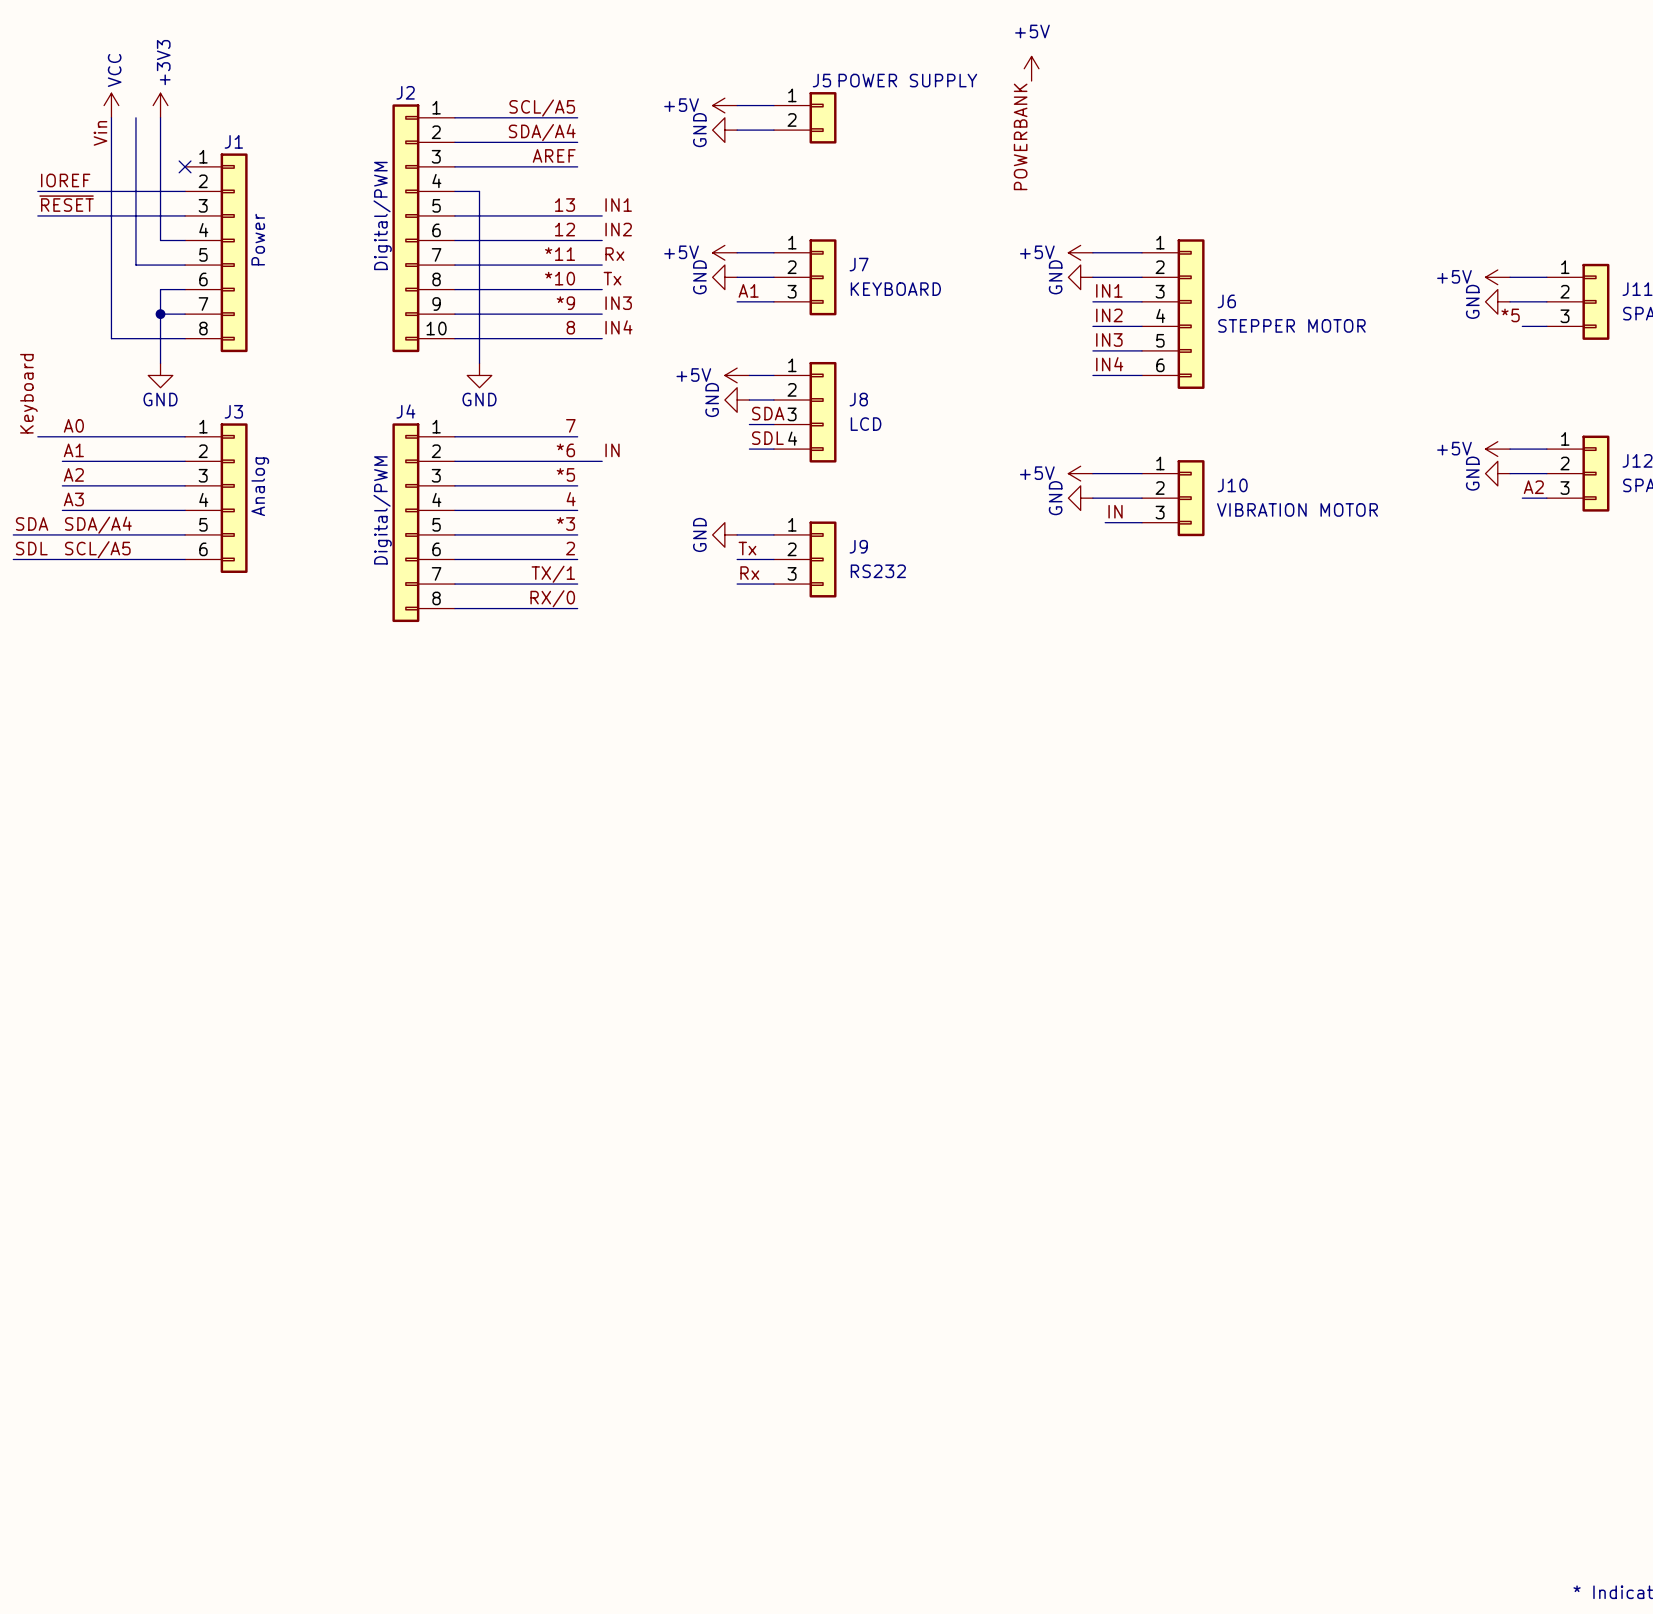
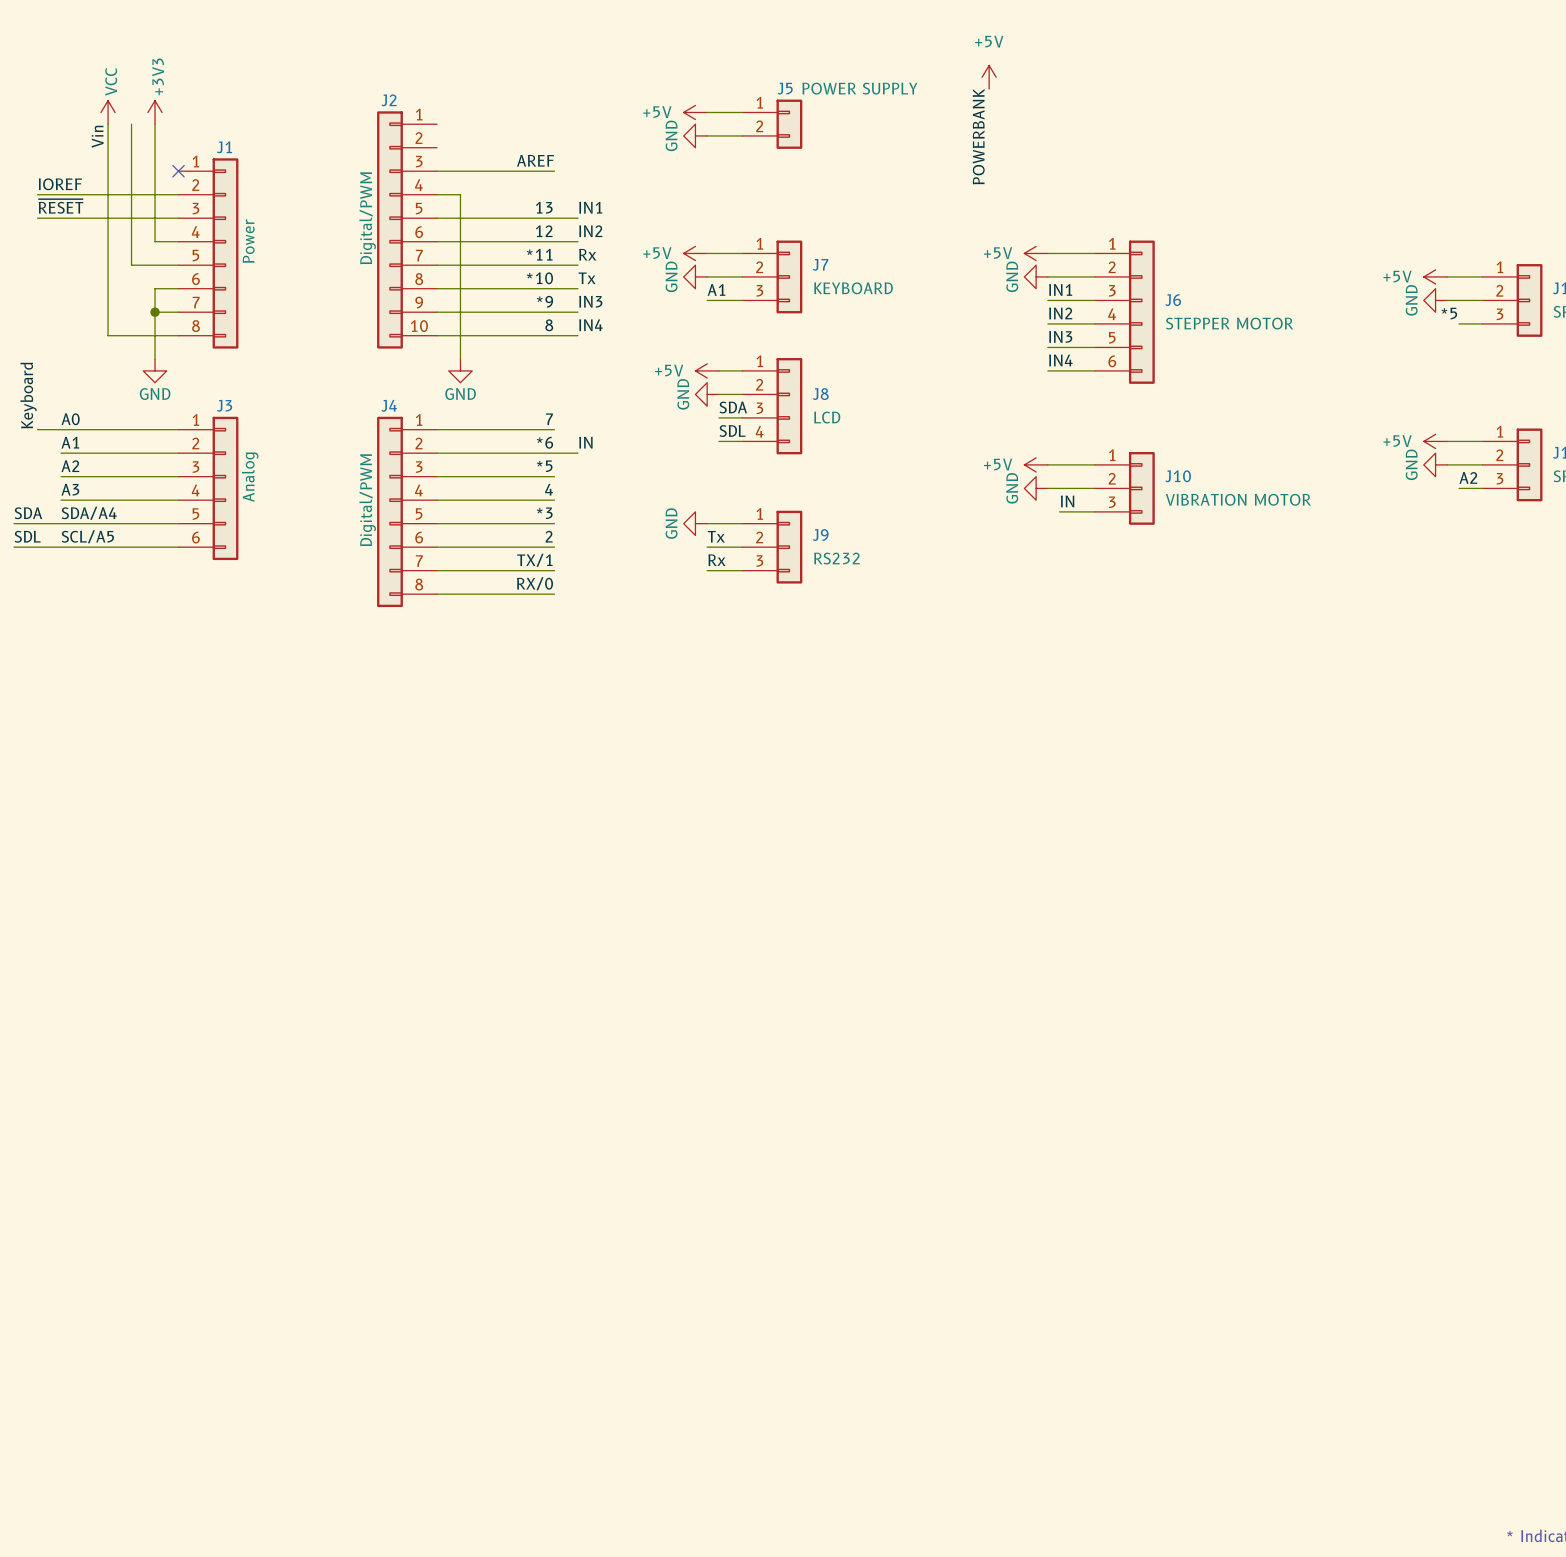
label: SCL/A5 (542, 108) -> none
wire: (454, 117) (577, 117) -> none
label: SDA/A4 (542, 132) -> none
wire: (454, 142) (577, 142) -> none

